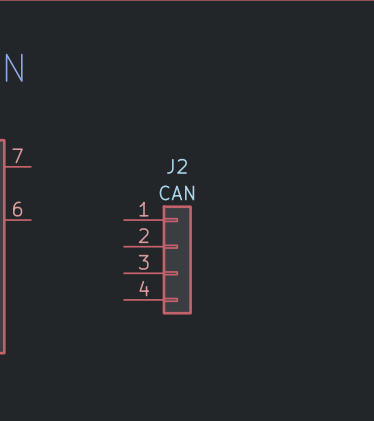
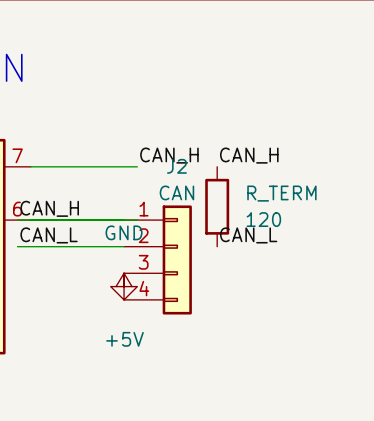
label: none -> CAN_H (169, 155)
label: none -> CAN_H (249, 155)
wire: none -> (30, 166) (137, 166)
R_TERM: none -> 120 (217, 206)
label: none -> CAN_H (49, 208)
wire: none -> (17, 220) (137, 220)
label: none -> CAN_L (49, 235)
label: none -> CAN_L (248, 235)
wire: none -> (17, 246) (124, 246)
power symbol: none -> GND (124, 286)
power symbol: none -> +5V (124, 286)

